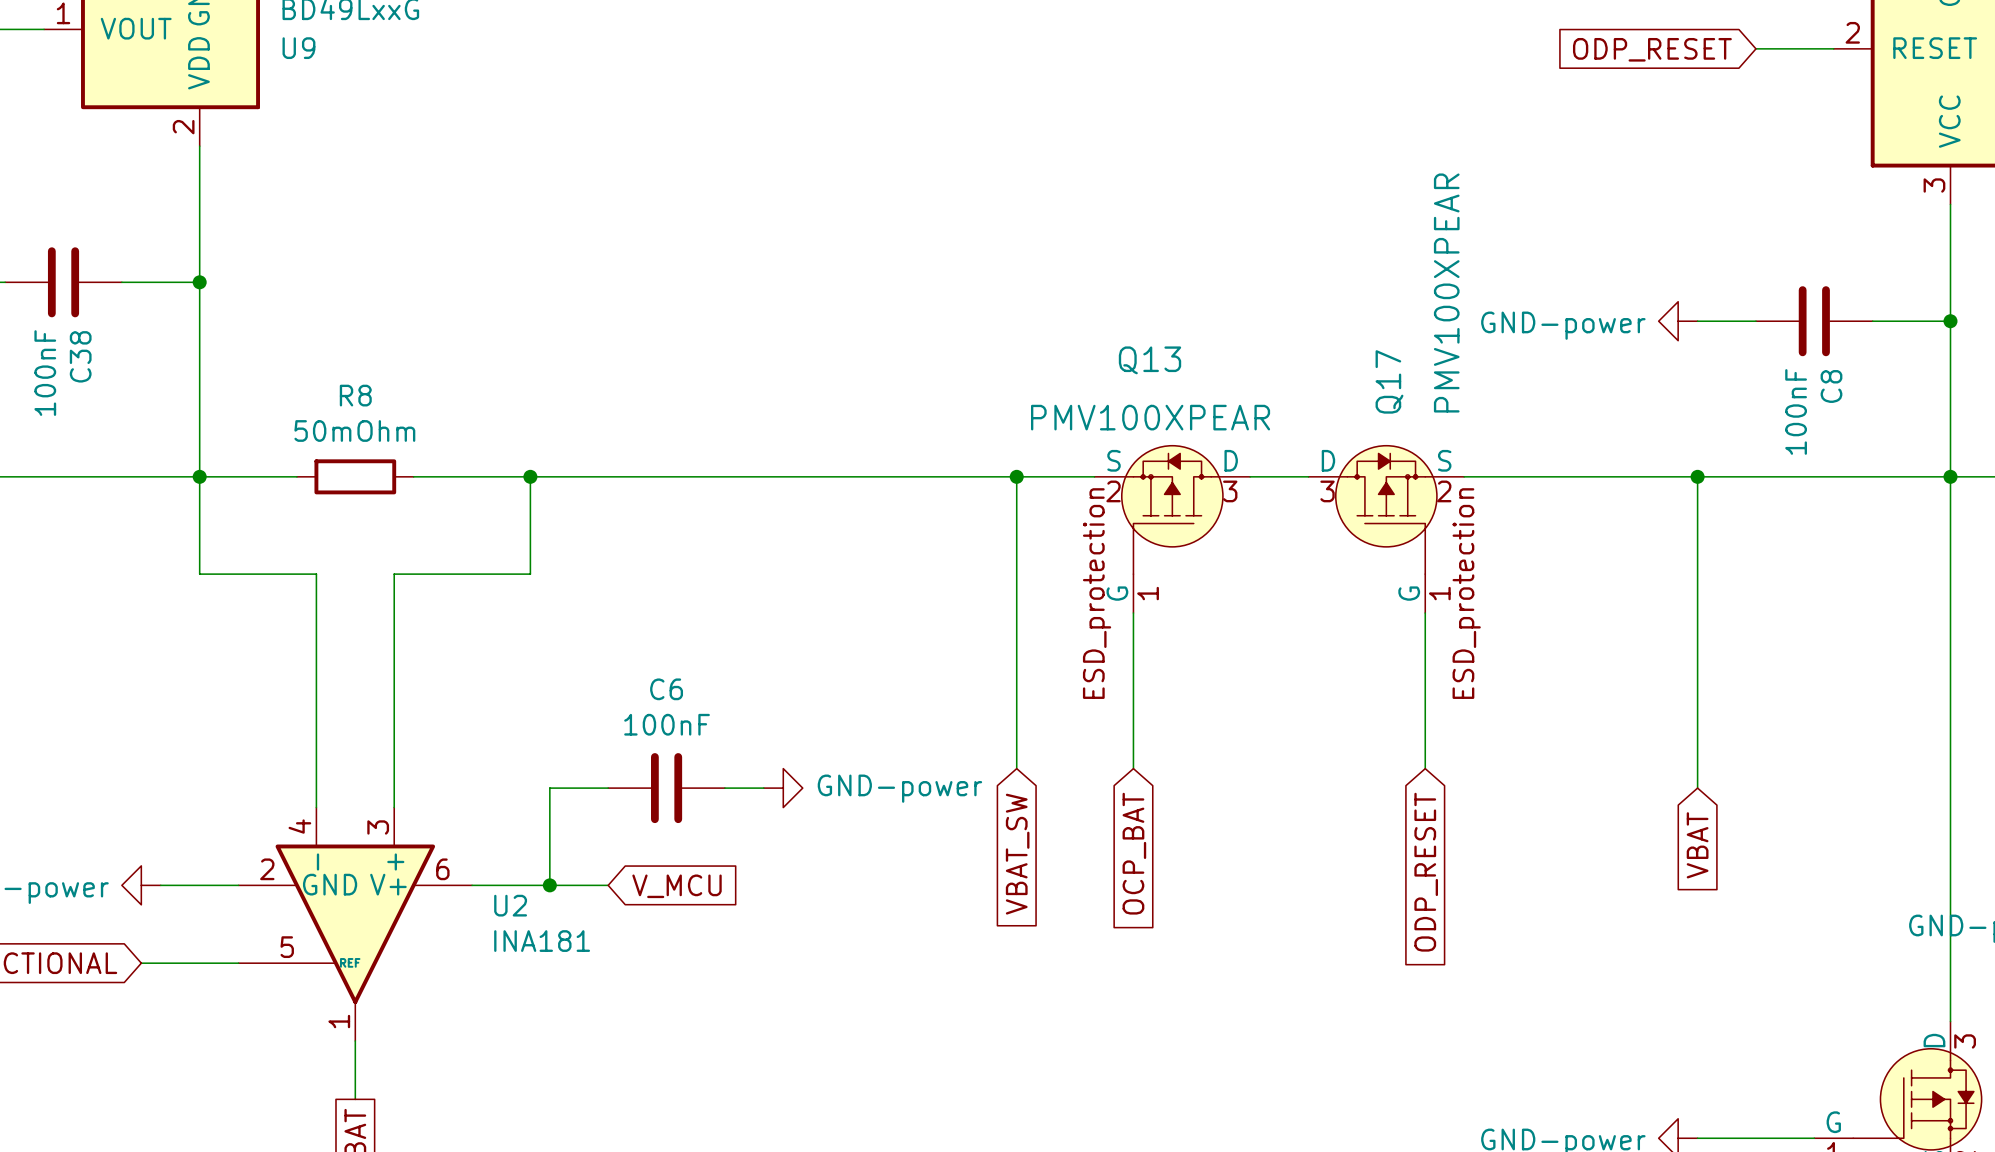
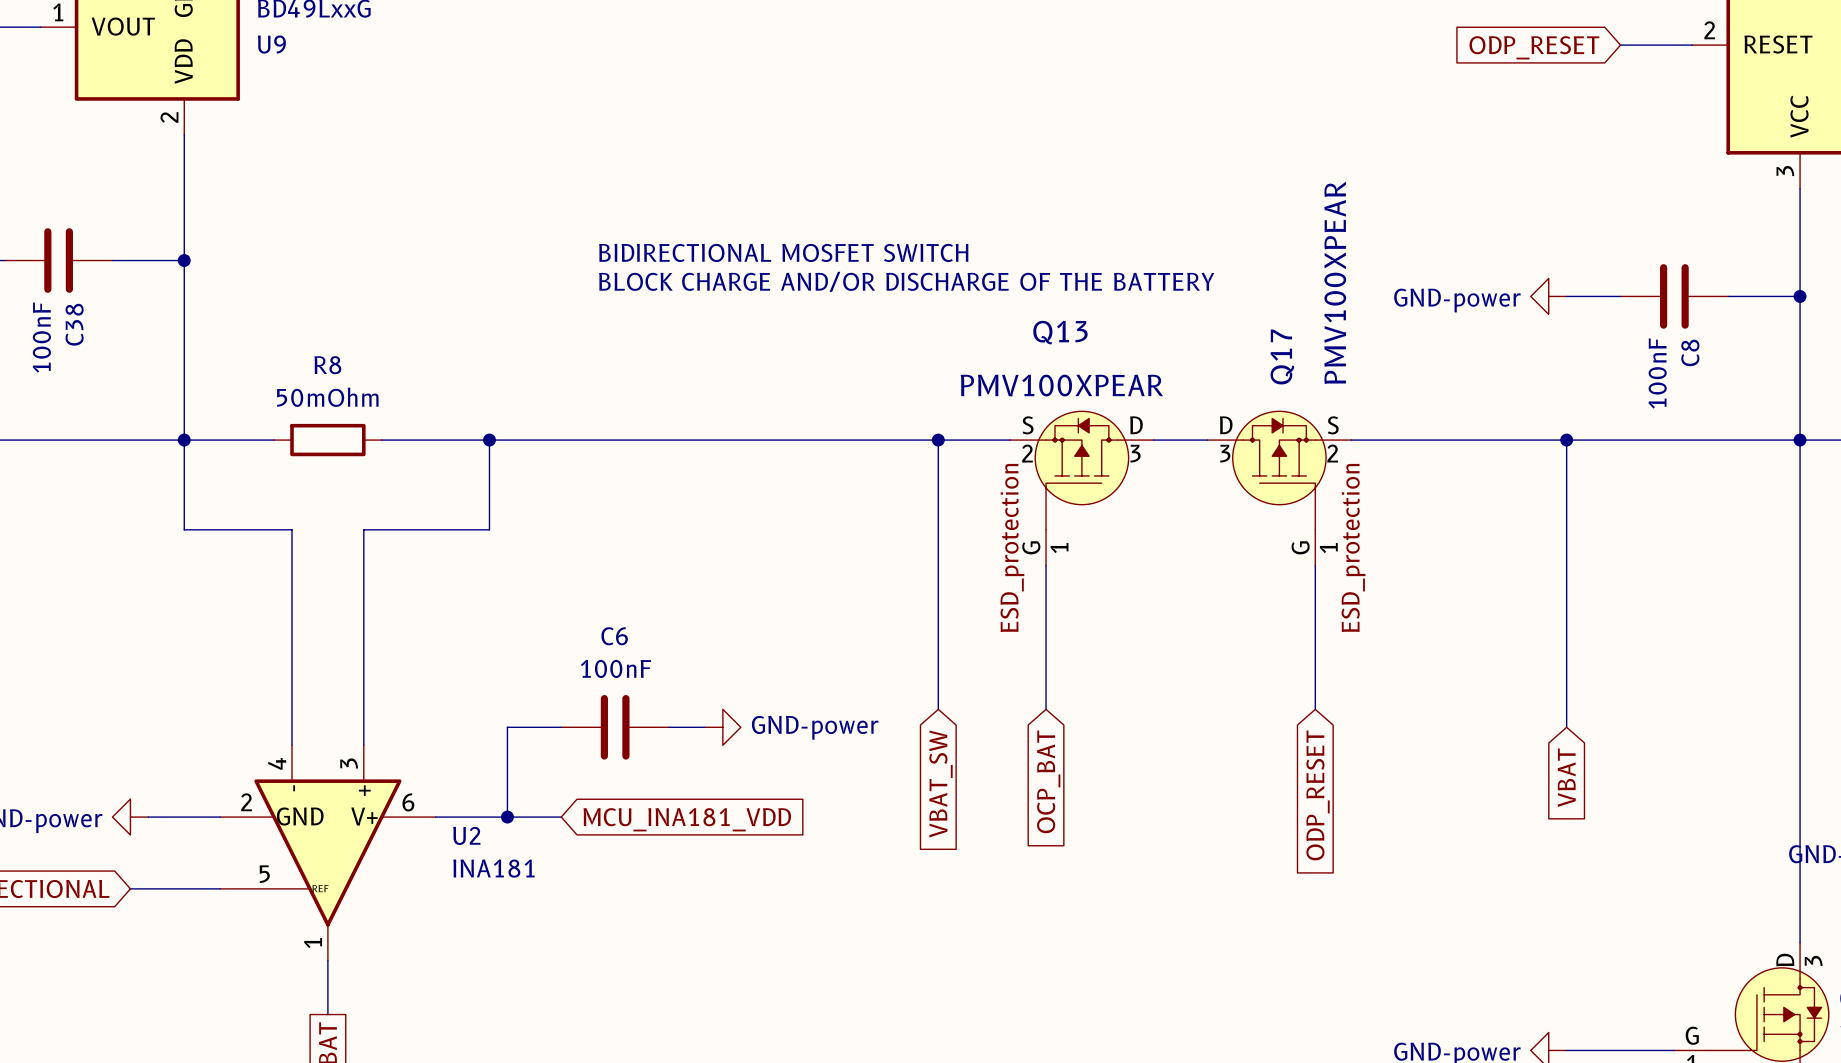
text: none -> BIDIRECTIONAL MOSFET SWITCH (783, 252)
text: none -> BLOCK CHARGE AND/OR DISCHARGE OF THE BATTERY (906, 281)
global label: V_MCU (677, 886) -> MCU_INA181_VDD (687, 819)

